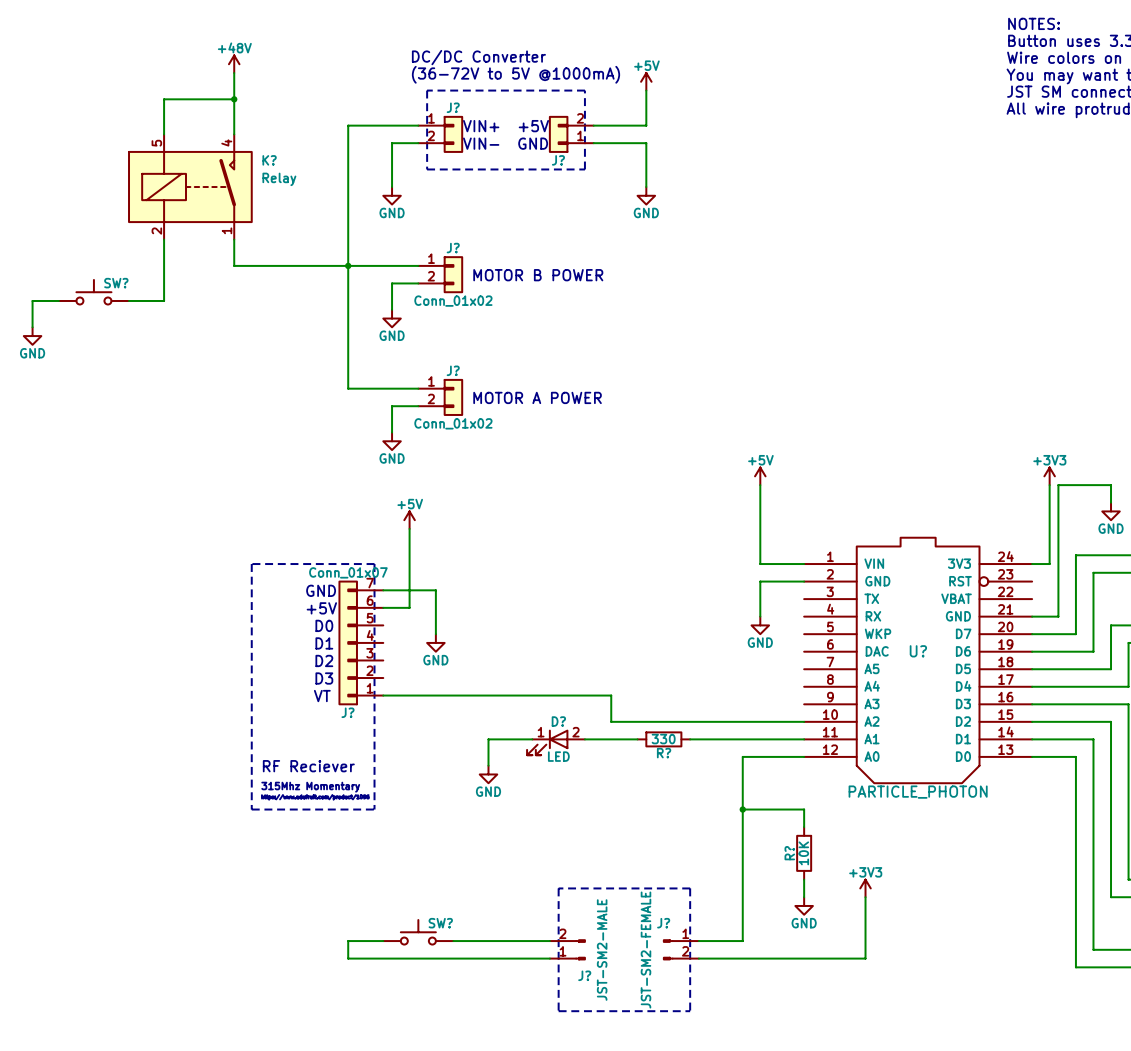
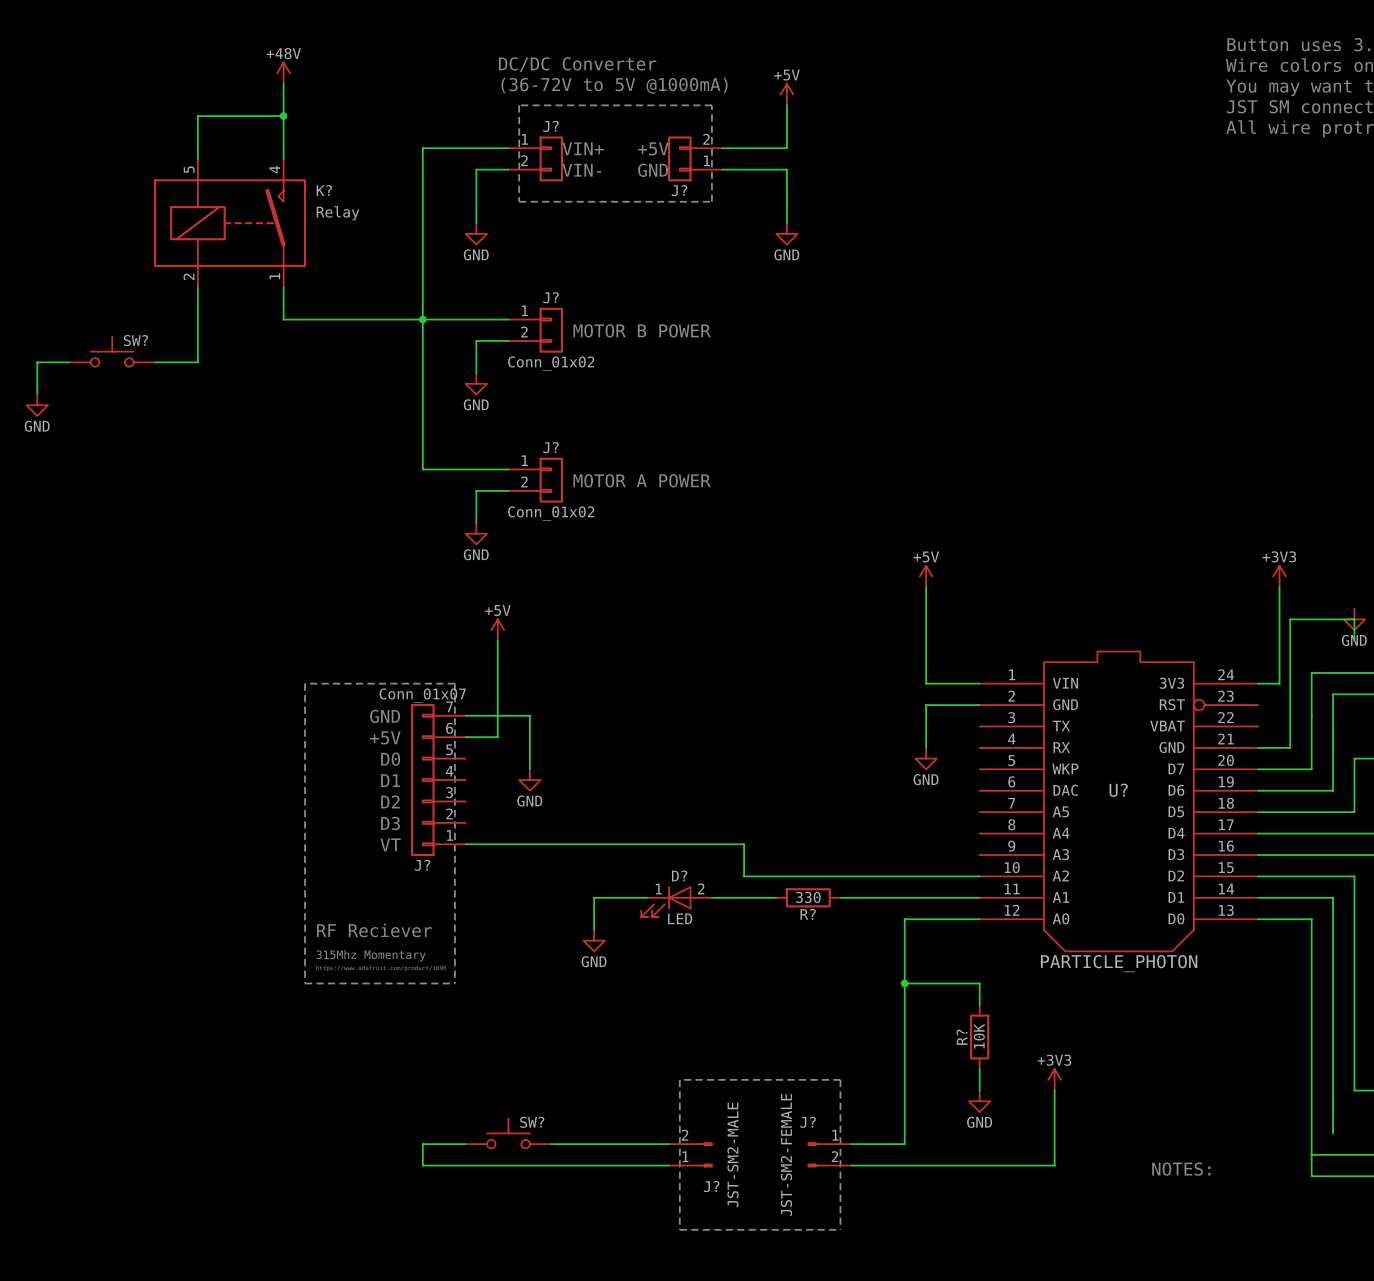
text: NOTES: (1034, 23) -> none
wire: (1111, 502) (1111, 485) (1058, 485) (1058, 511) -> (1354, 640) (1354, 619) (1290, 619)
wire: (1093, 932) (1093, 949) -> (1311, 1154) (1333, 1154)
text: none -> NOTES: (1181, 1169)

